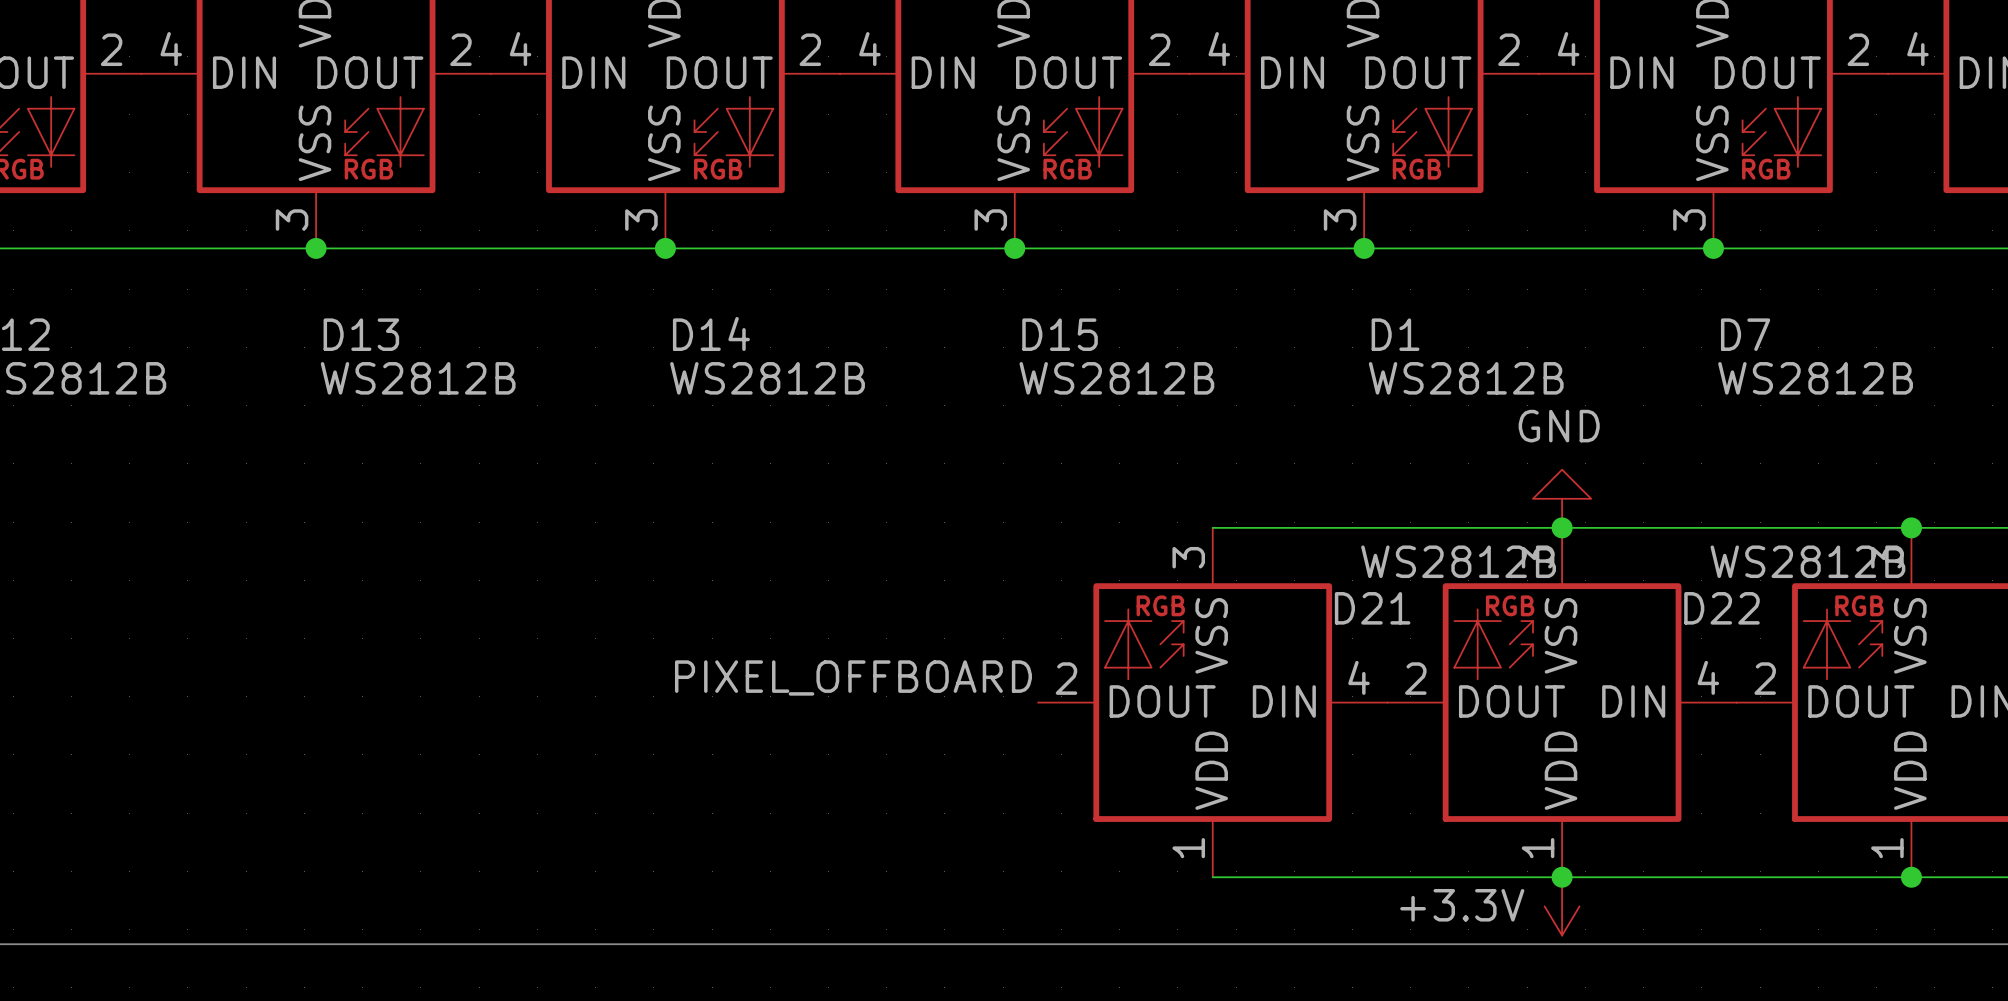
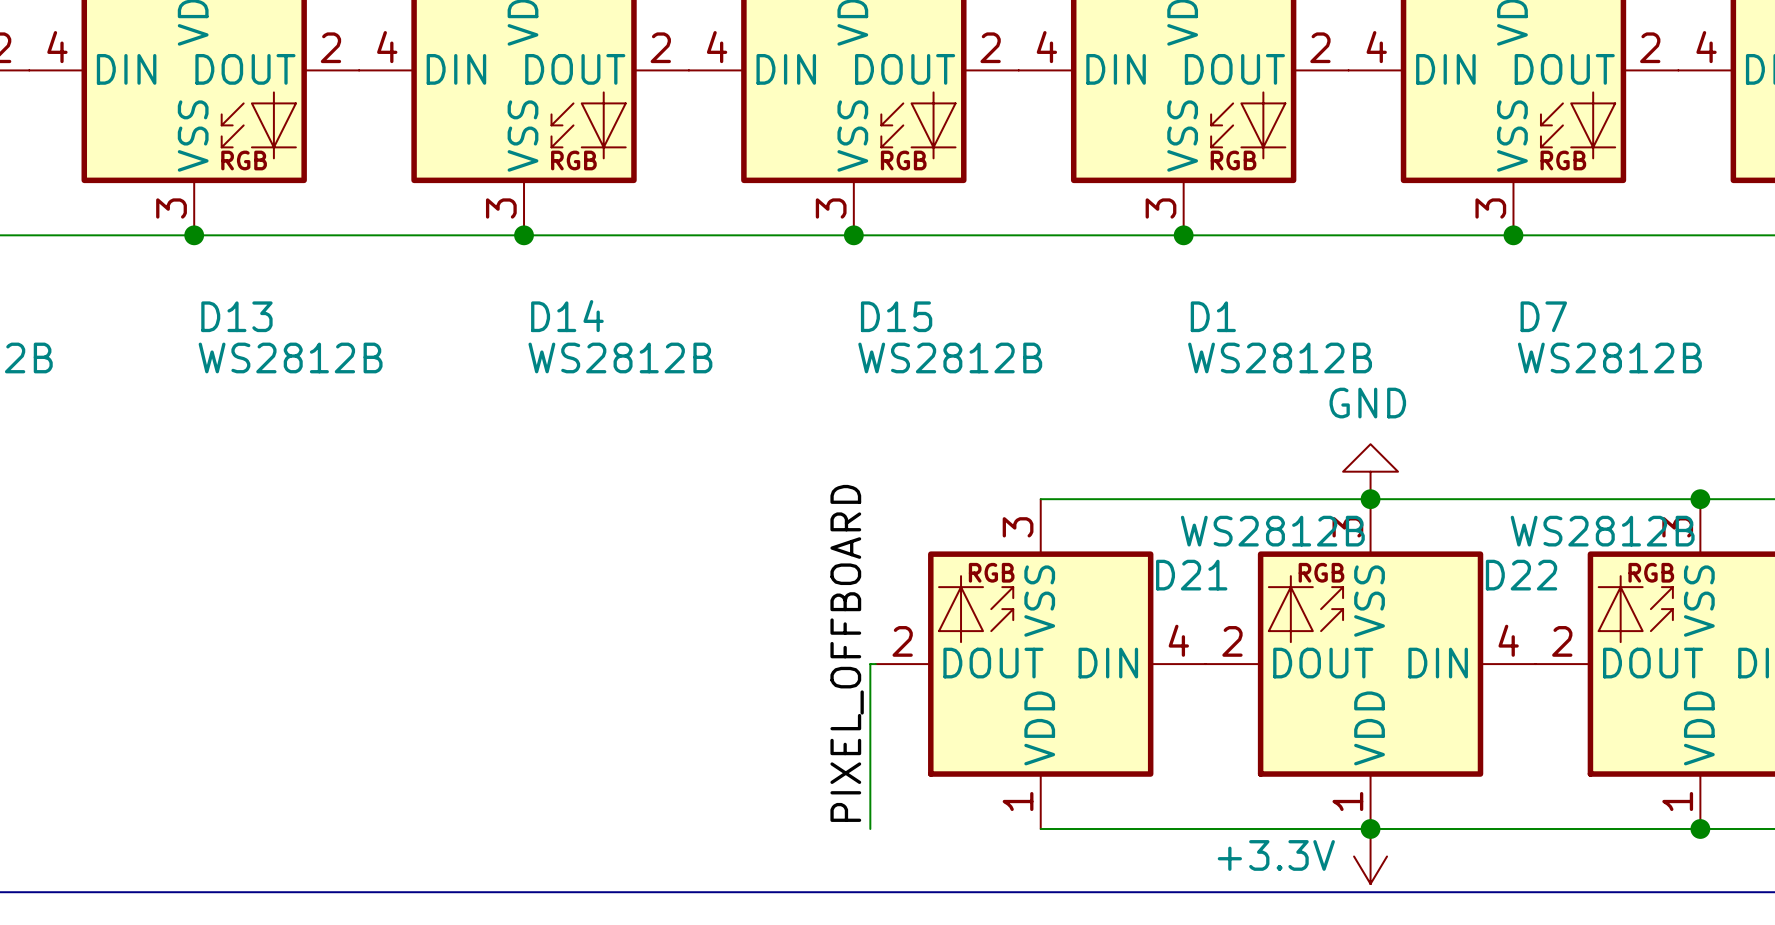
label rotation: 0° (853, 677) -> 90° counterclockwise (847, 653)
wire: none -> (875, 664) (870, 664) (870, 828)

